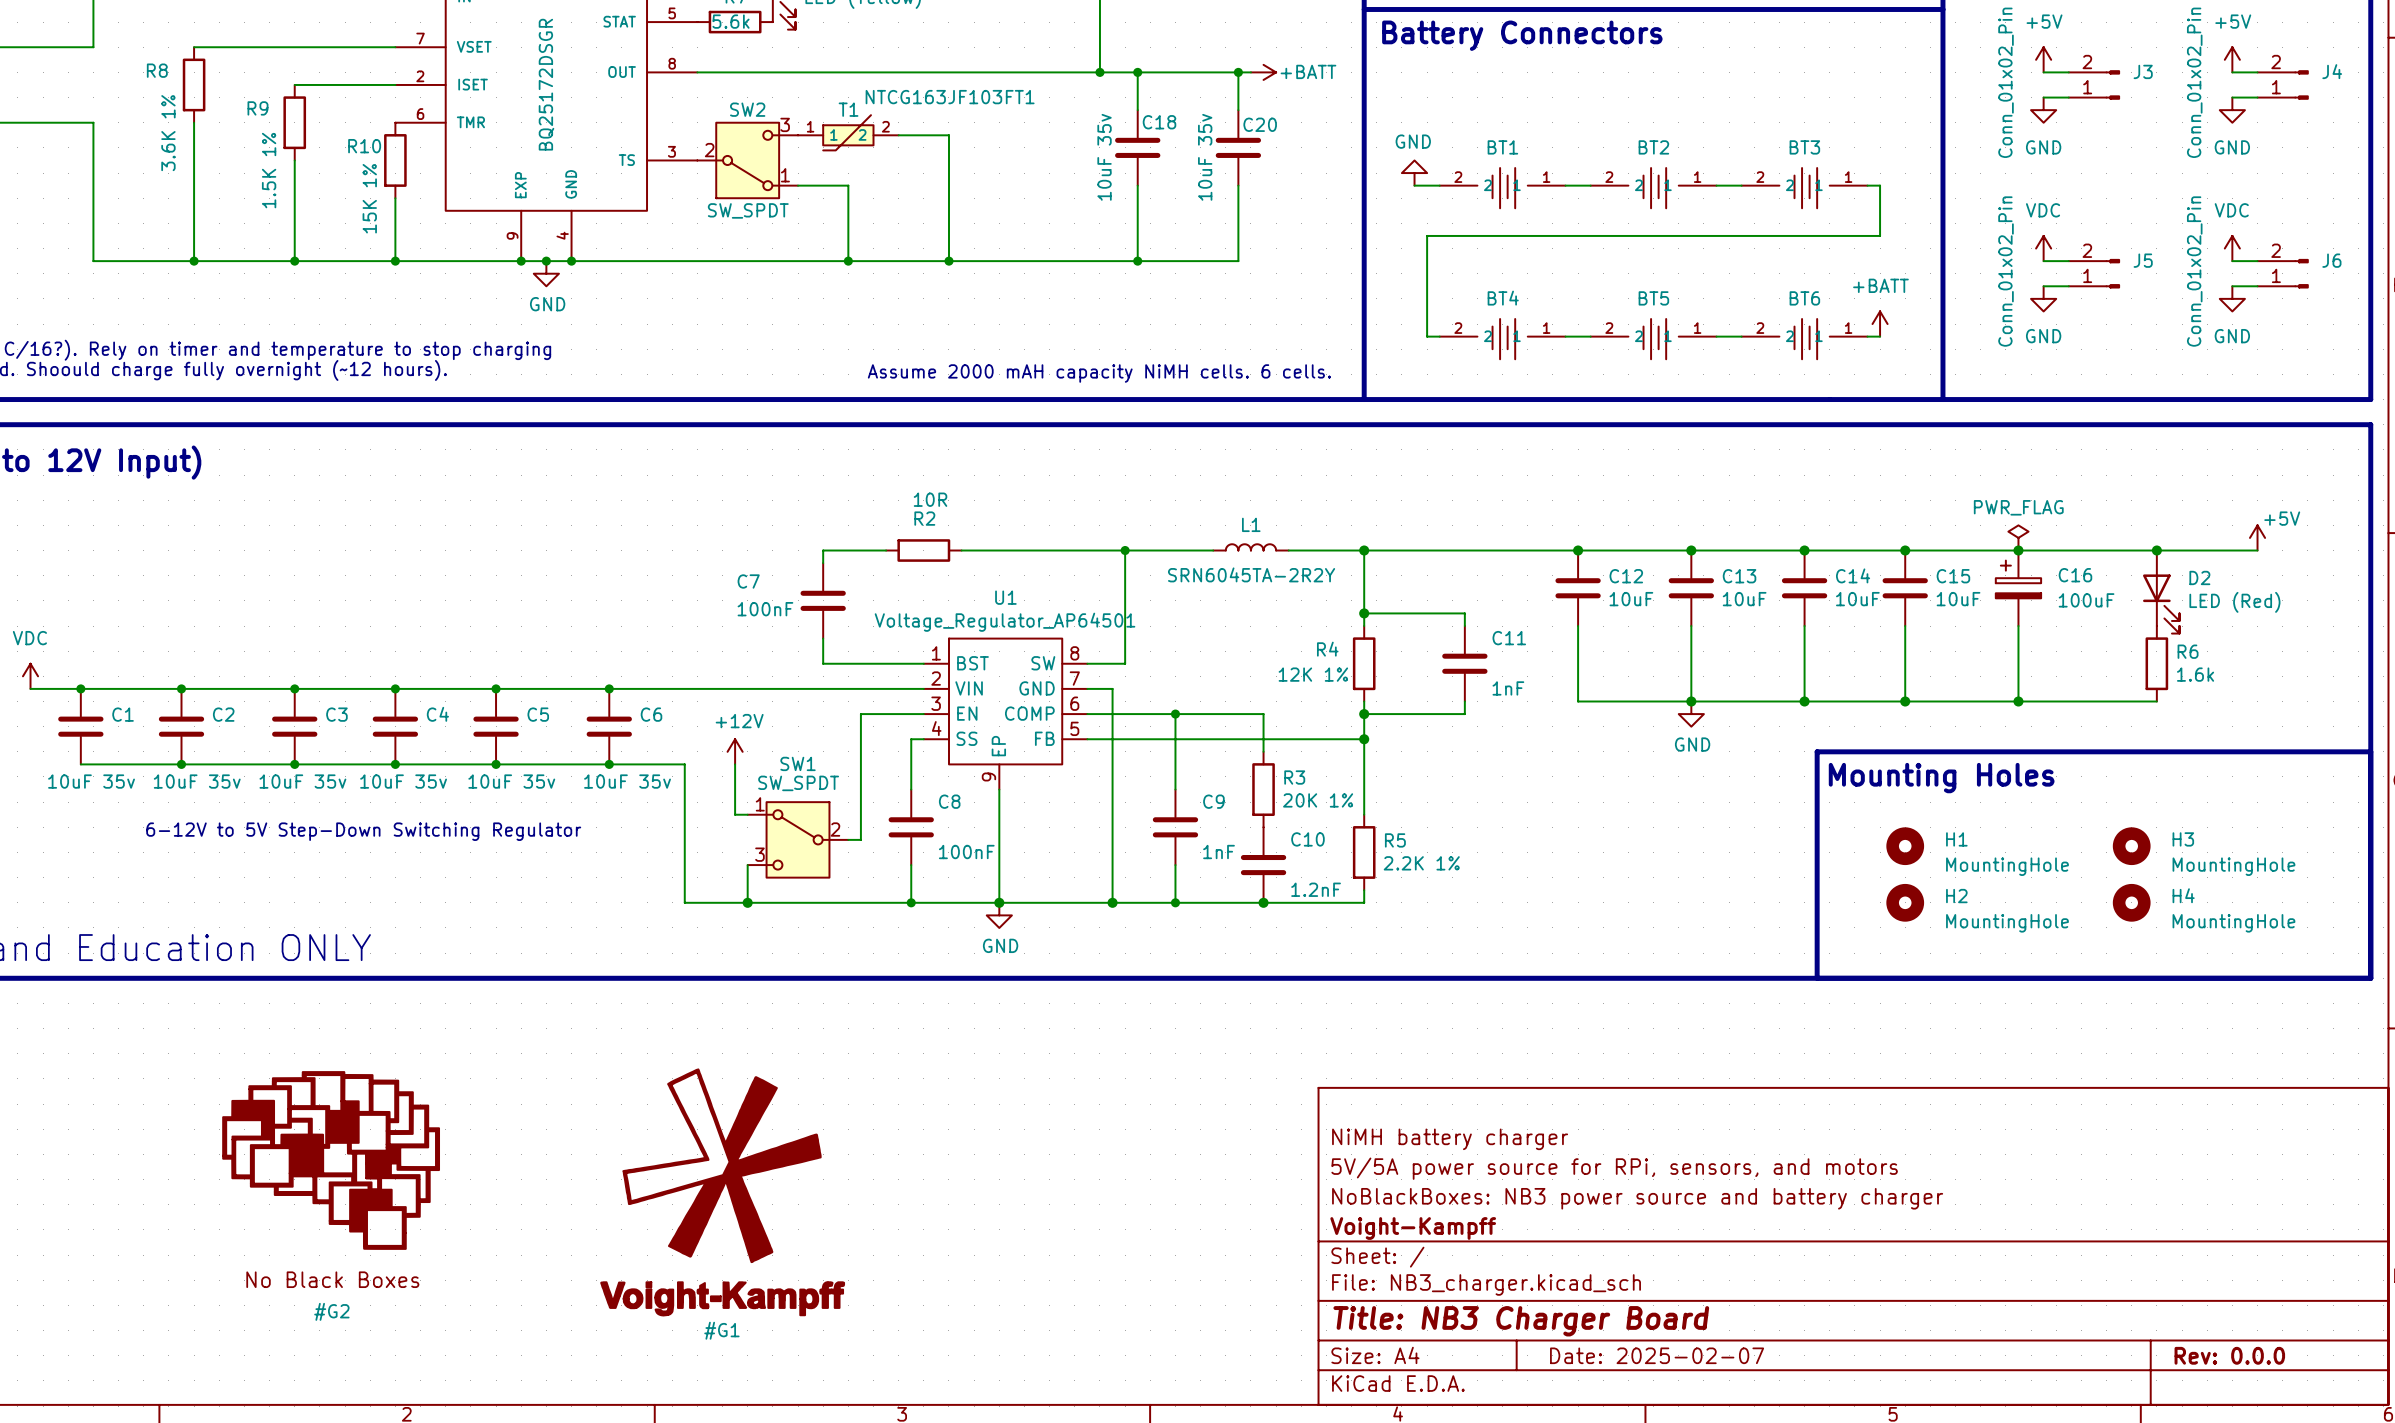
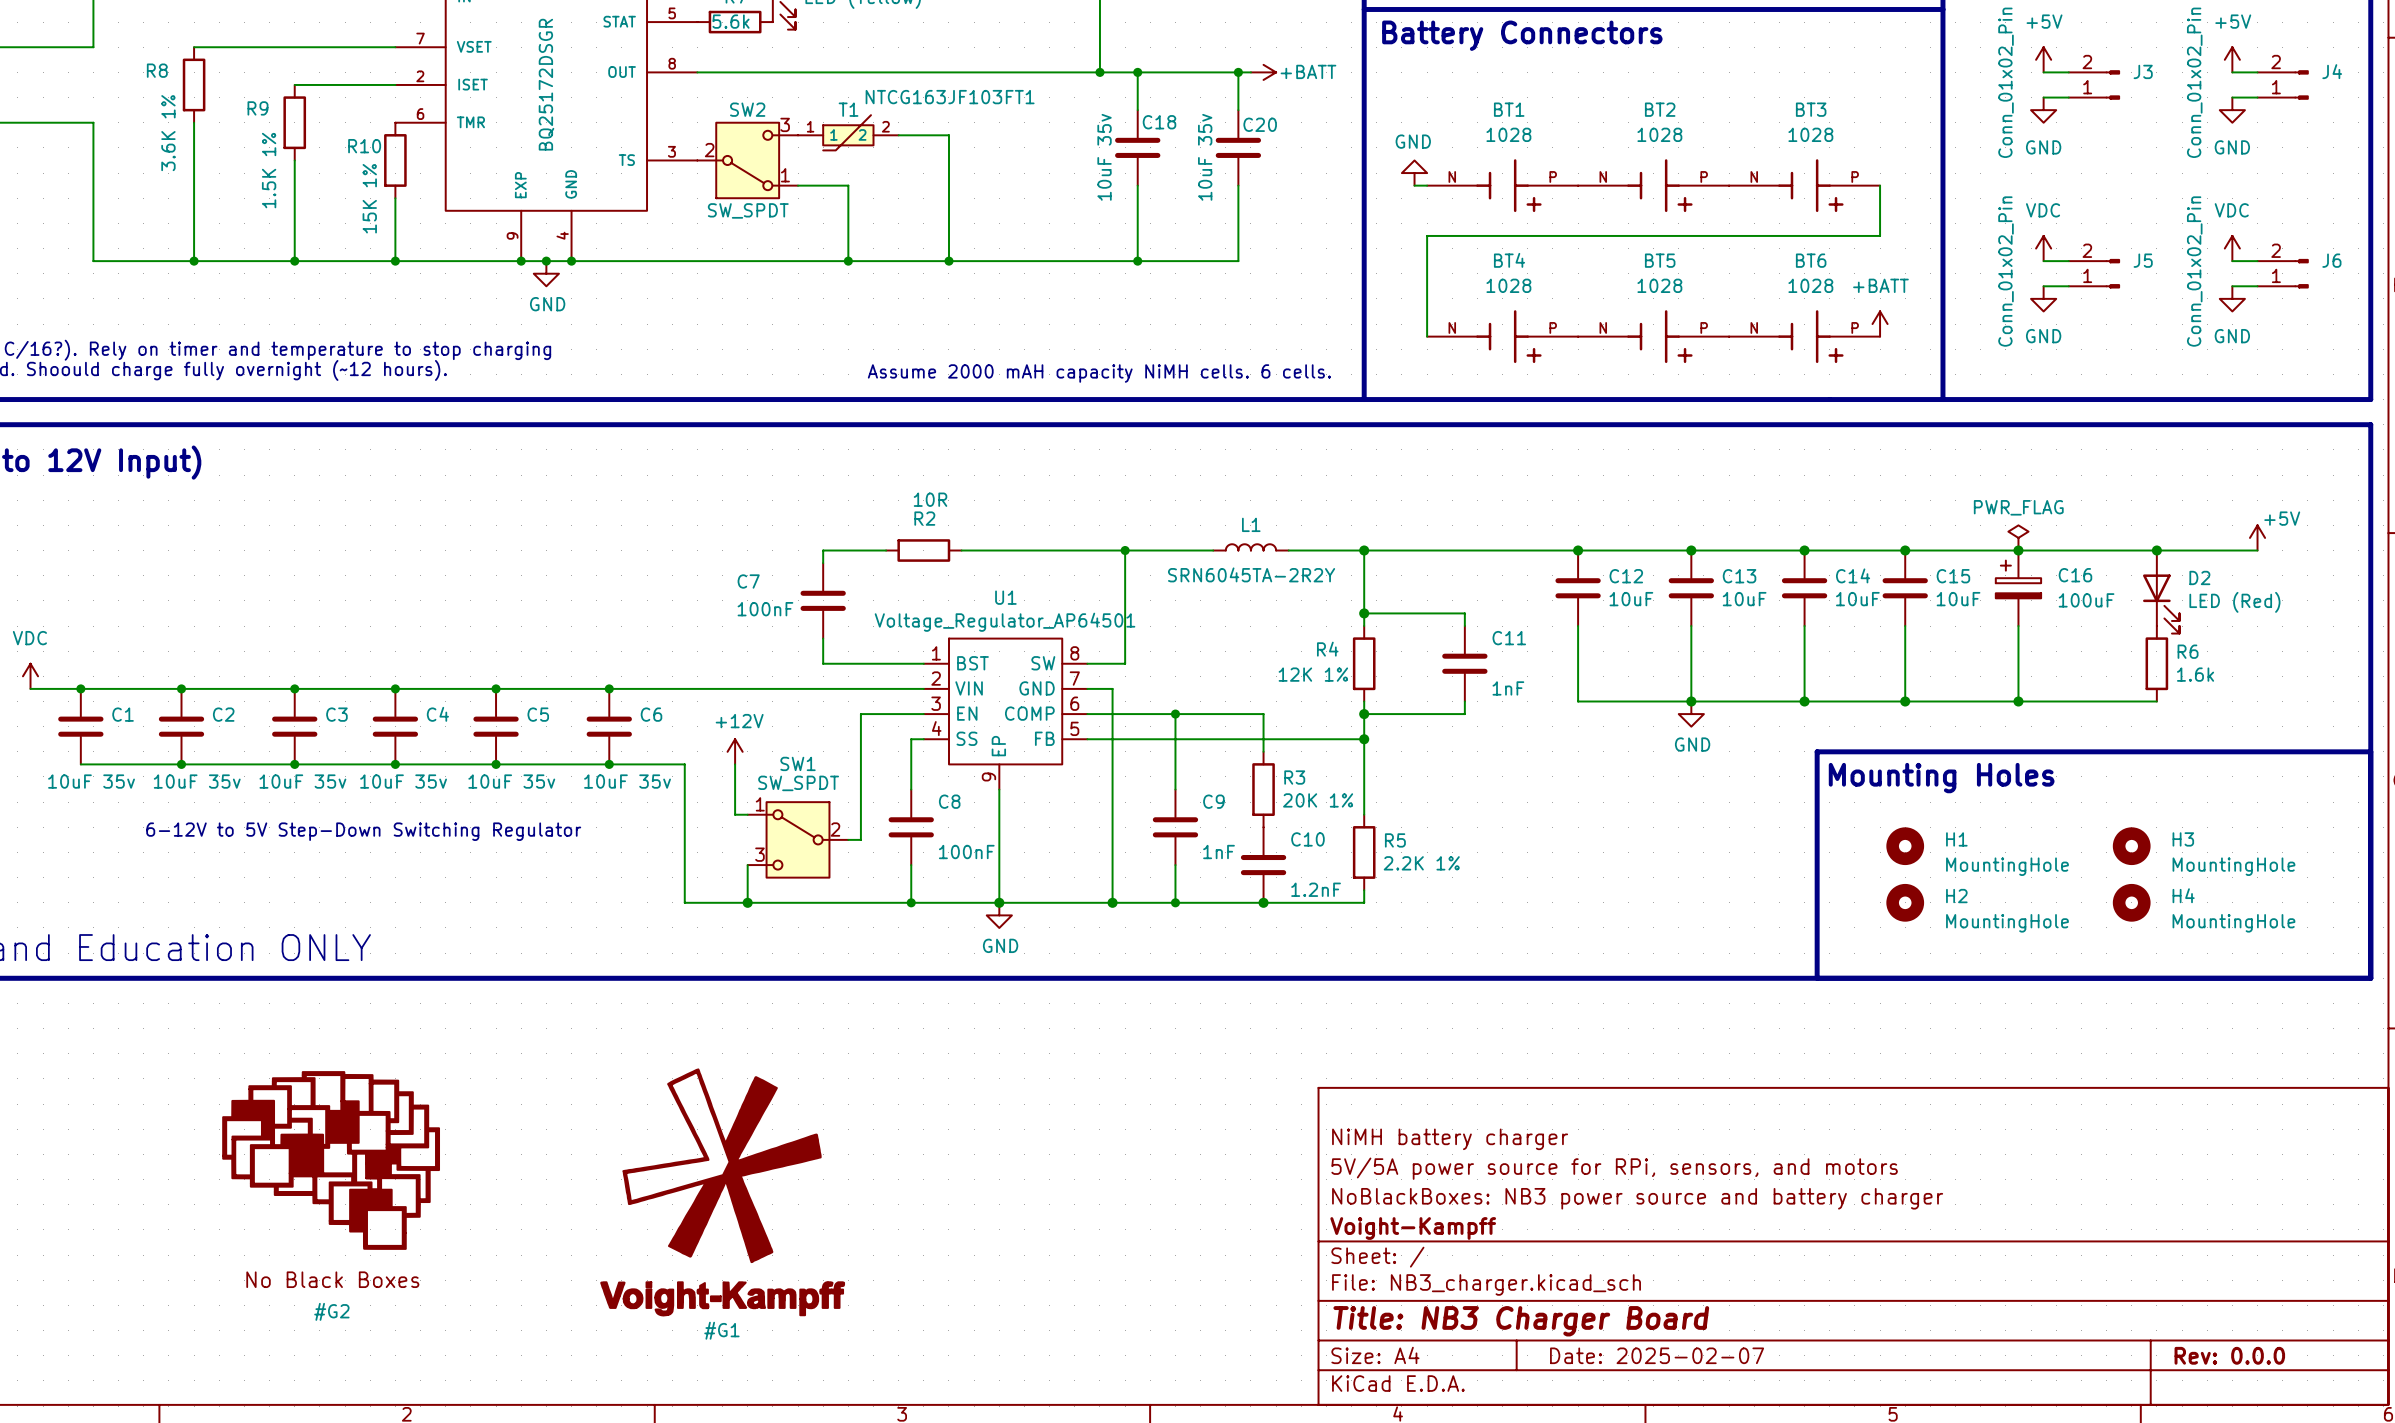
BT1 value: none -> 1028 (1508, 134)
BT2 value: none -> 1028 (1659, 134)
BT3 value: none -> 1028 (1810, 134)
BT1 name position: BT1 (1502, 147) -> BT1 (1509, 109)
BT2 name position: BT2 (1653, 147) -> BT2 (1660, 109)
BT3 name position: BT3 (1804, 147) -> BT3 (1811, 109)
BT1 symbol: [1439, 168, 1566, 209] -> [1427, 159, 1579, 213]
BT2 symbol: [1590, 168, 1717, 209] -> [1578, 159, 1730, 213]
BT3 symbol: [1741, 168, 1868, 209] -> [1729, 159, 1881, 213]
BT4 value: none -> 1028 (1508, 285)
BT5 value: none -> 1028 (1659, 285)
BT6 value: none -> 1028 (1810, 285)
BT4 name position: BT4 (1503, 298) -> BT4 (1509, 260)
BT5 name position: BT5 (1653, 298) -> BT5 (1660, 260)
BT6 name position: BT6 (1804, 298) -> BT6 (1811, 260)
BT4 symbol: [1439, 319, 1566, 360] -> [1427, 310, 1579, 364]
BT5 symbol: [1590, 319, 1717, 360] -> [1578, 310, 1730, 364]
BT6 symbol: [1741, 319, 1868, 360] -> [1729, 310, 1881, 364]

